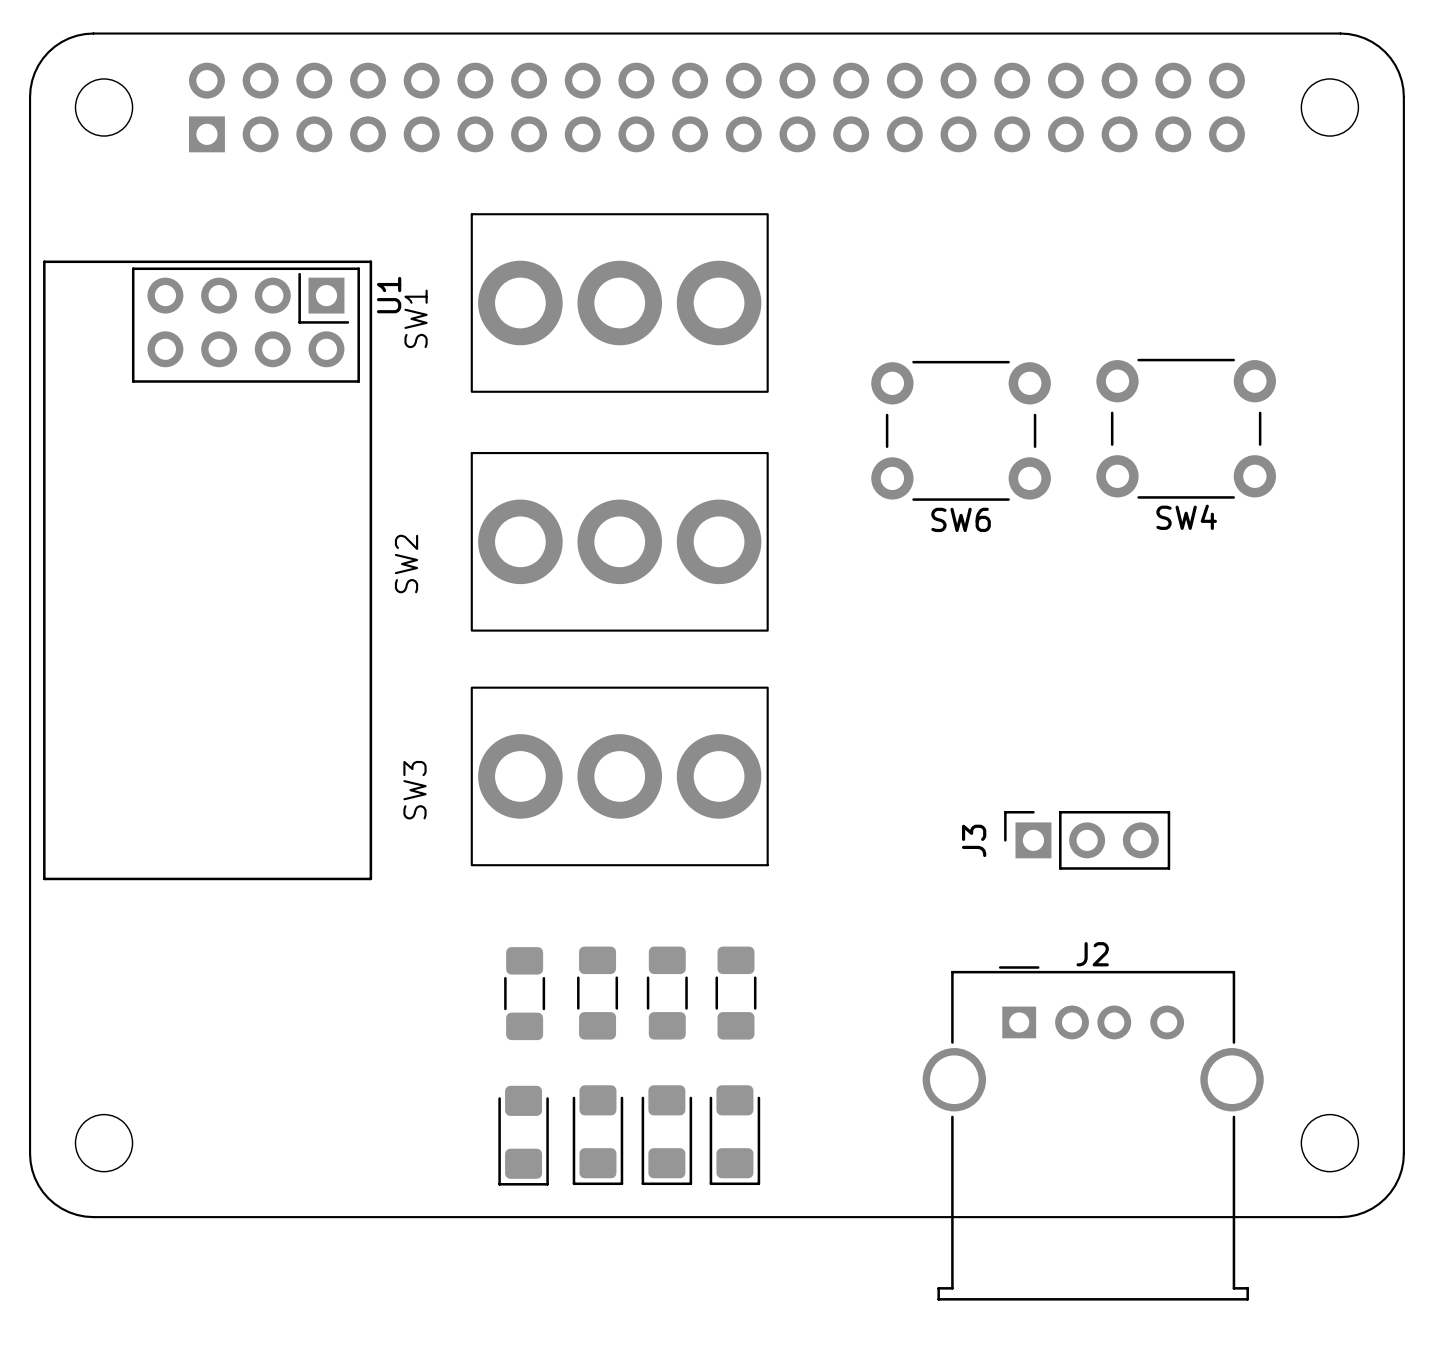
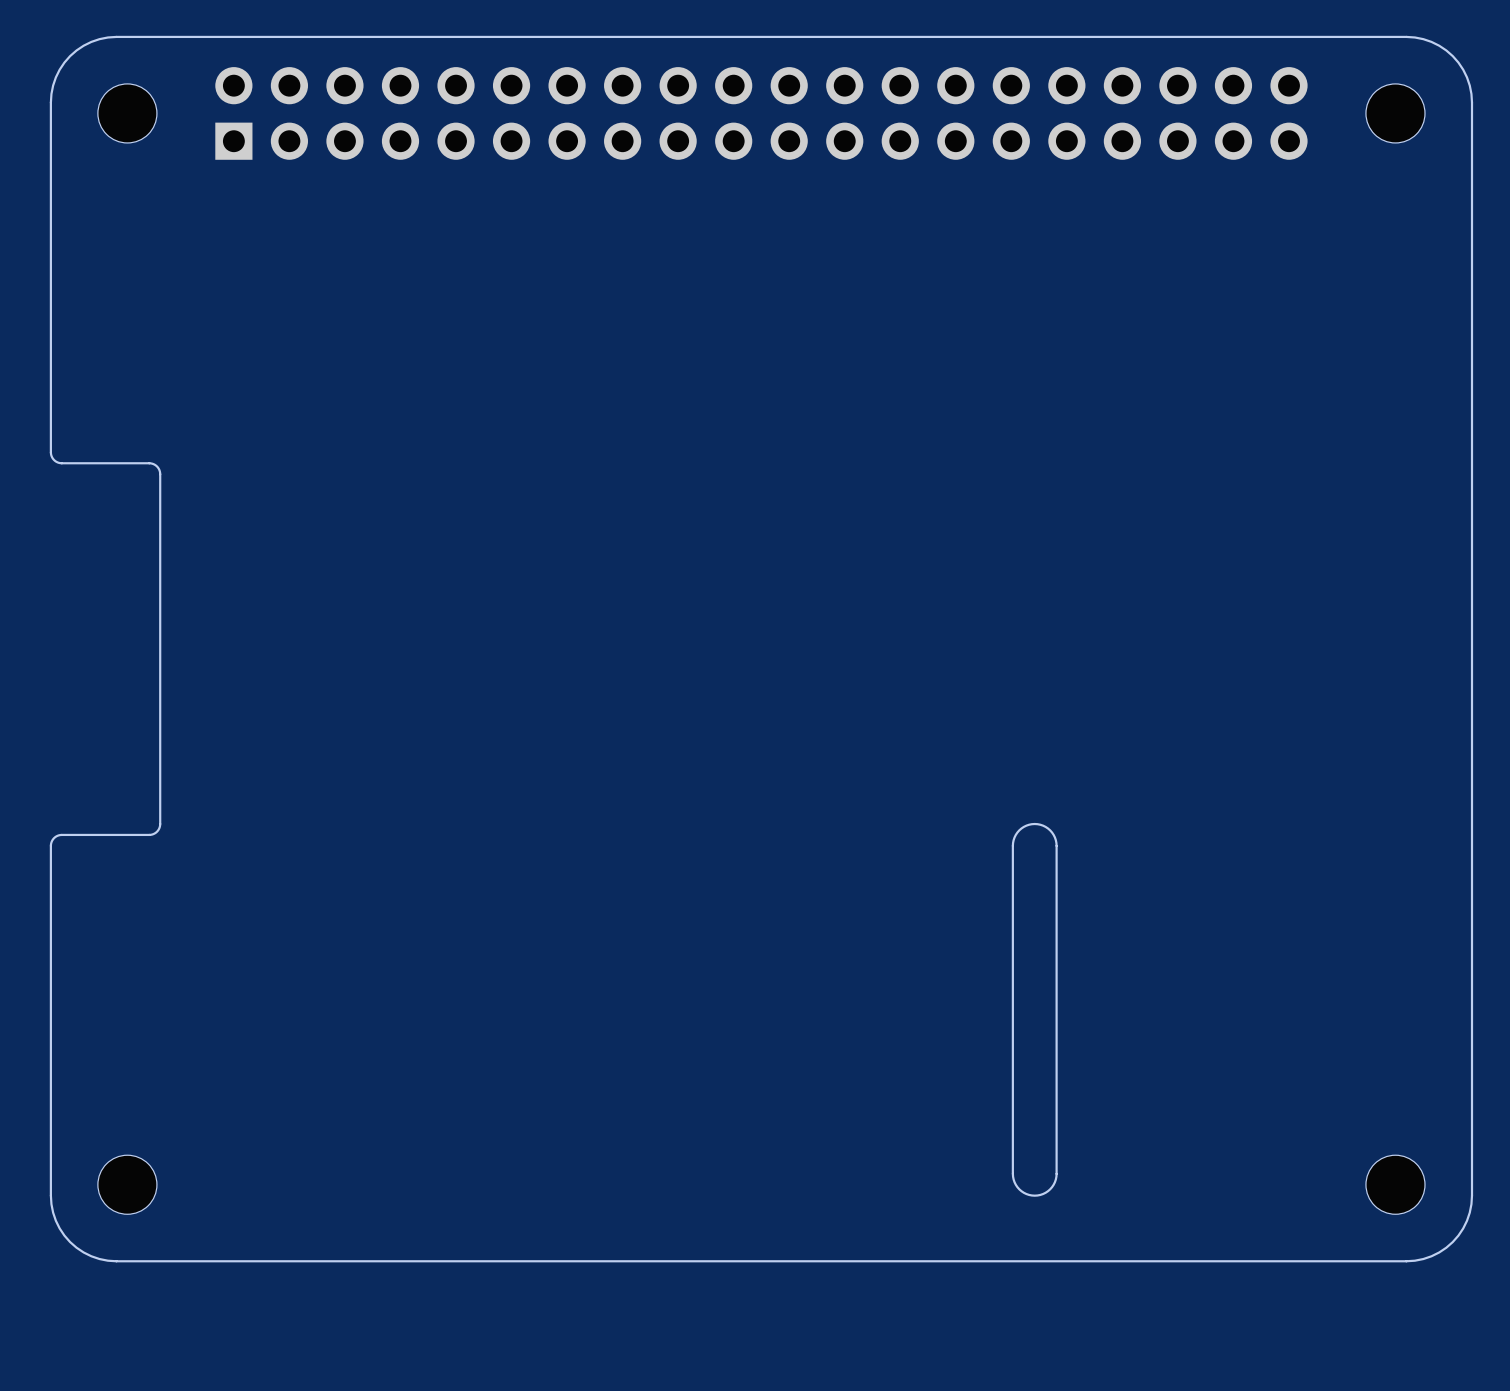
SW1: (619, 303) -> none
SW4: (1186, 428) -> none
SW6: (961, 430) -> none
board edge: (30, 435) (30, 815) -> (50, 452) (53, 458) (60, 463) (152, 463) (157, 467) (160, 474) (159, 826) (157, 831) (150, 834) (60, 835) (54, 838) (50, 845)
SW2: (619, 541) -> none
U1: (207, 570) -> none
SW3: (619, 776) -> none
board edge: none -> (1012, 845) (1013, 1176) (1015, 1184) (1021, 1191) (1029, 1194) (1037, 1195) (1045, 1192) (1052, 1187) (1056, 1173) (1056, 843) (1050, 830) (1043, 825) (1034, 824) (1026, 825) (1019, 830) (1014, 837) (1012, 845)
J3: (1087, 840) -> none
part: (524, 993) -> none
part: (597, 993) -> none
part: (667, 993) -> none
part: (735, 993) -> none
J2: (1093, 1133) -> none
part: (523, 1135) -> none
part: (597, 1135) -> none
part: (666, 1135) -> none
part: (734, 1135) -> none

